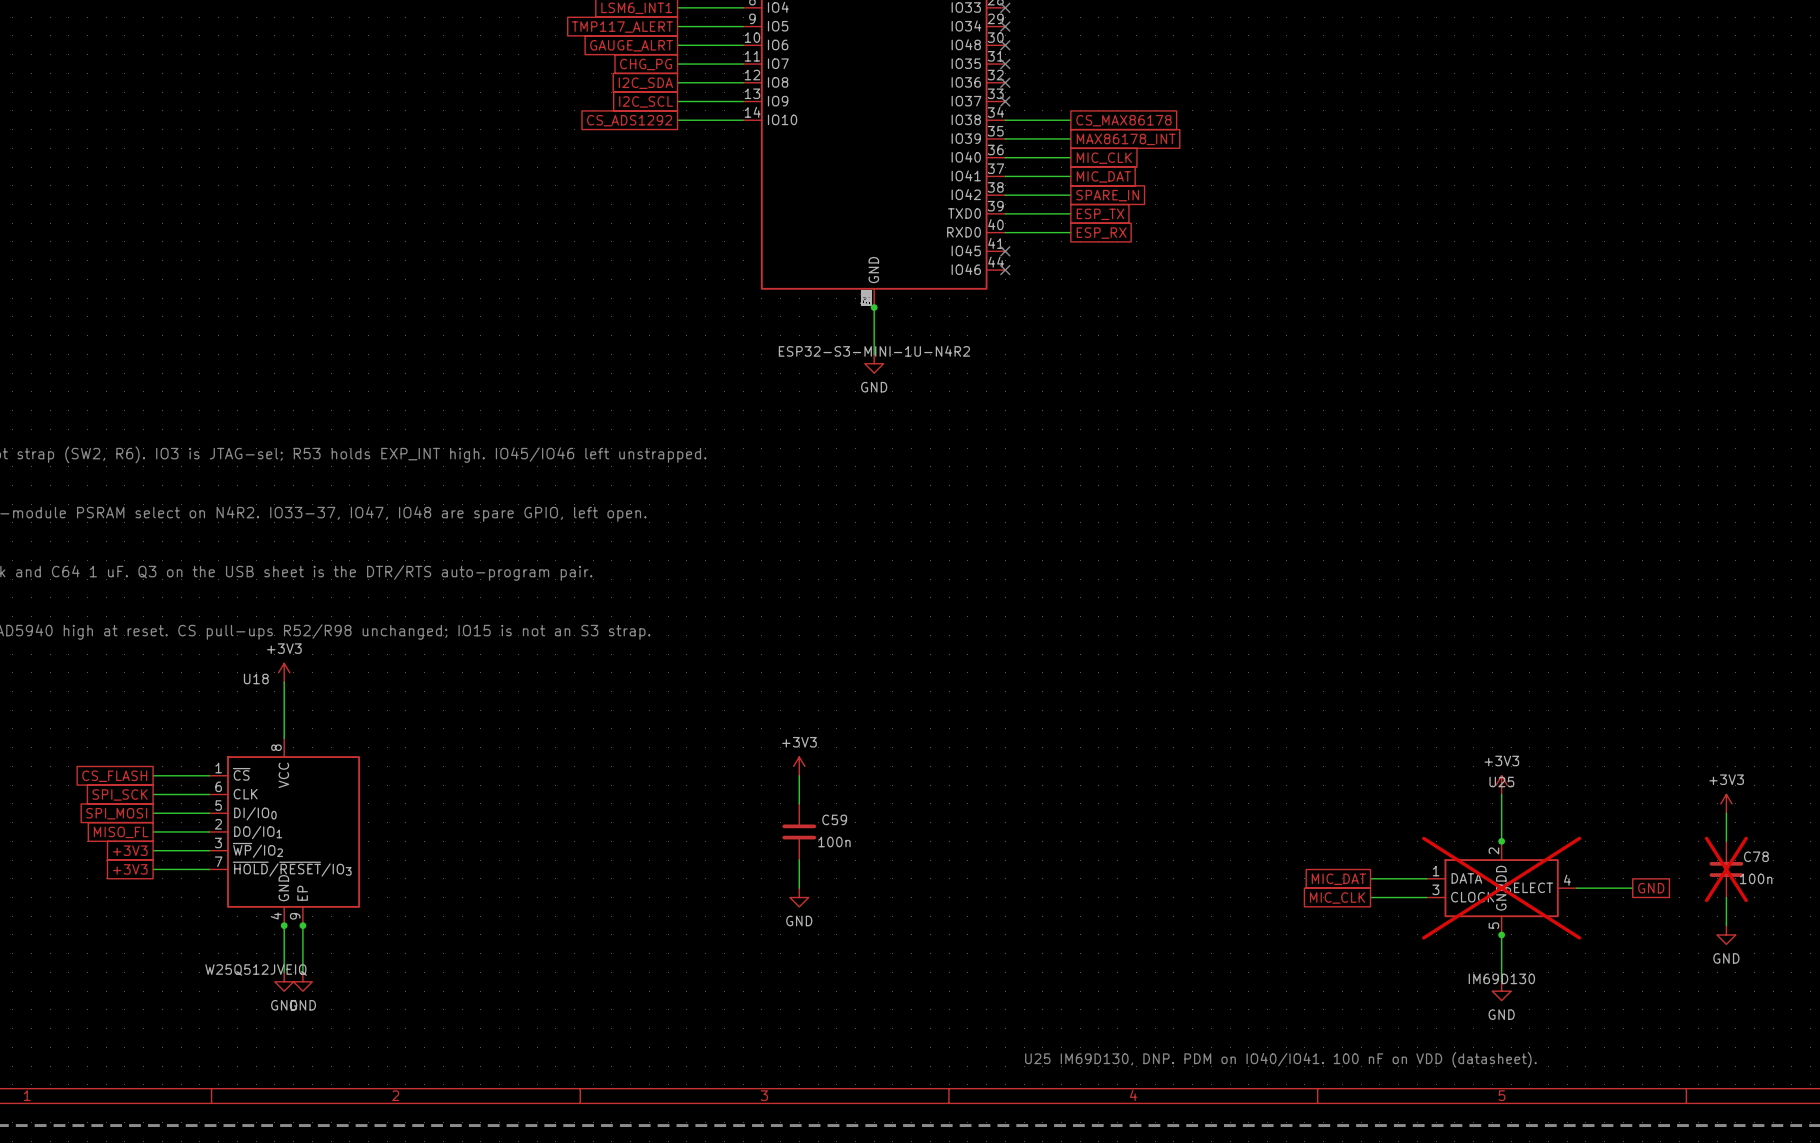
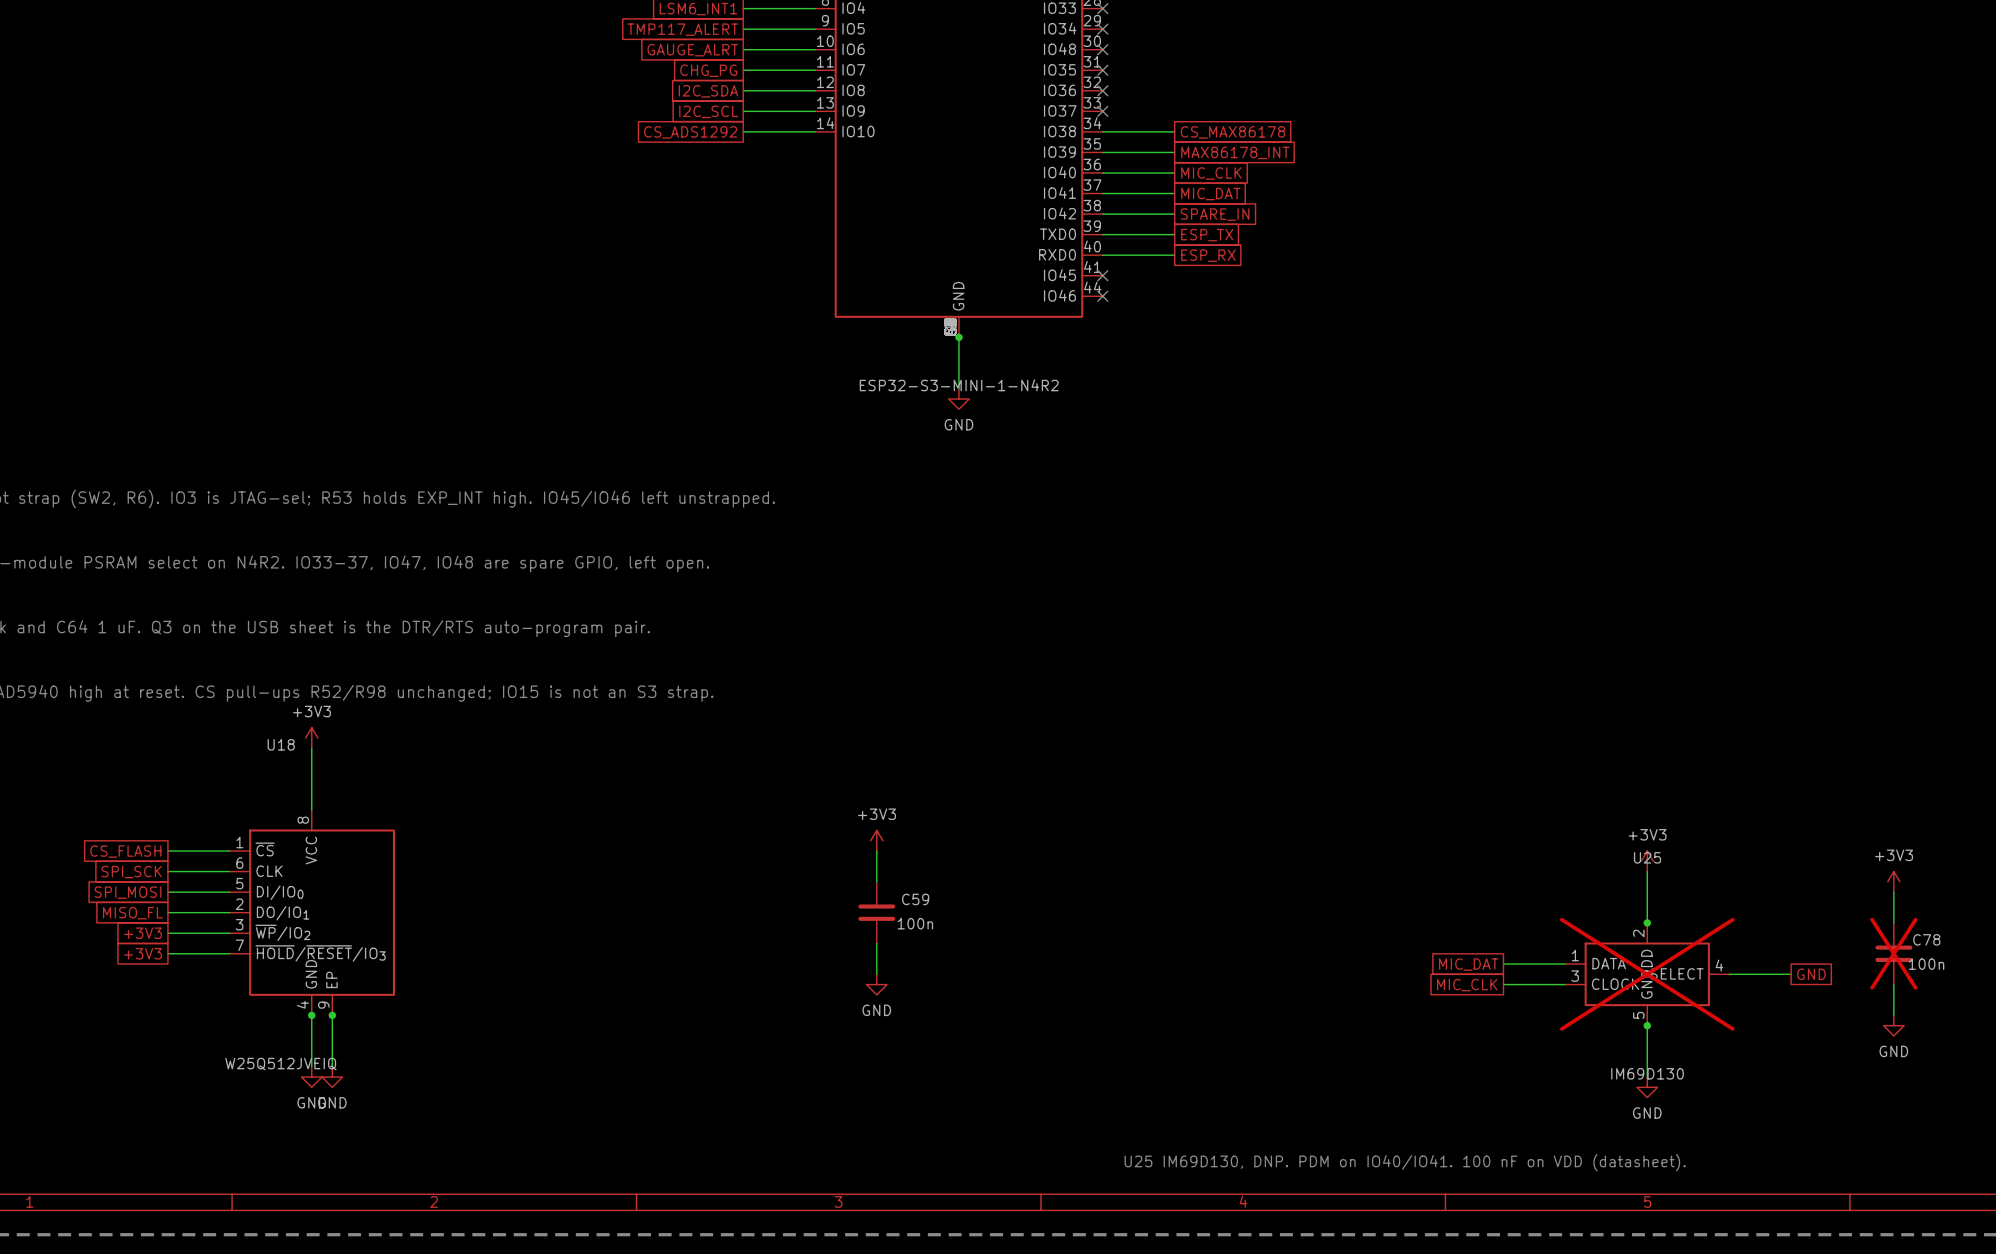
part value: ESP32-S3-MINI-1U-N4R2 (874, 351) -> ESP32-S3-MINI-1-N4R2 (959, 385)

